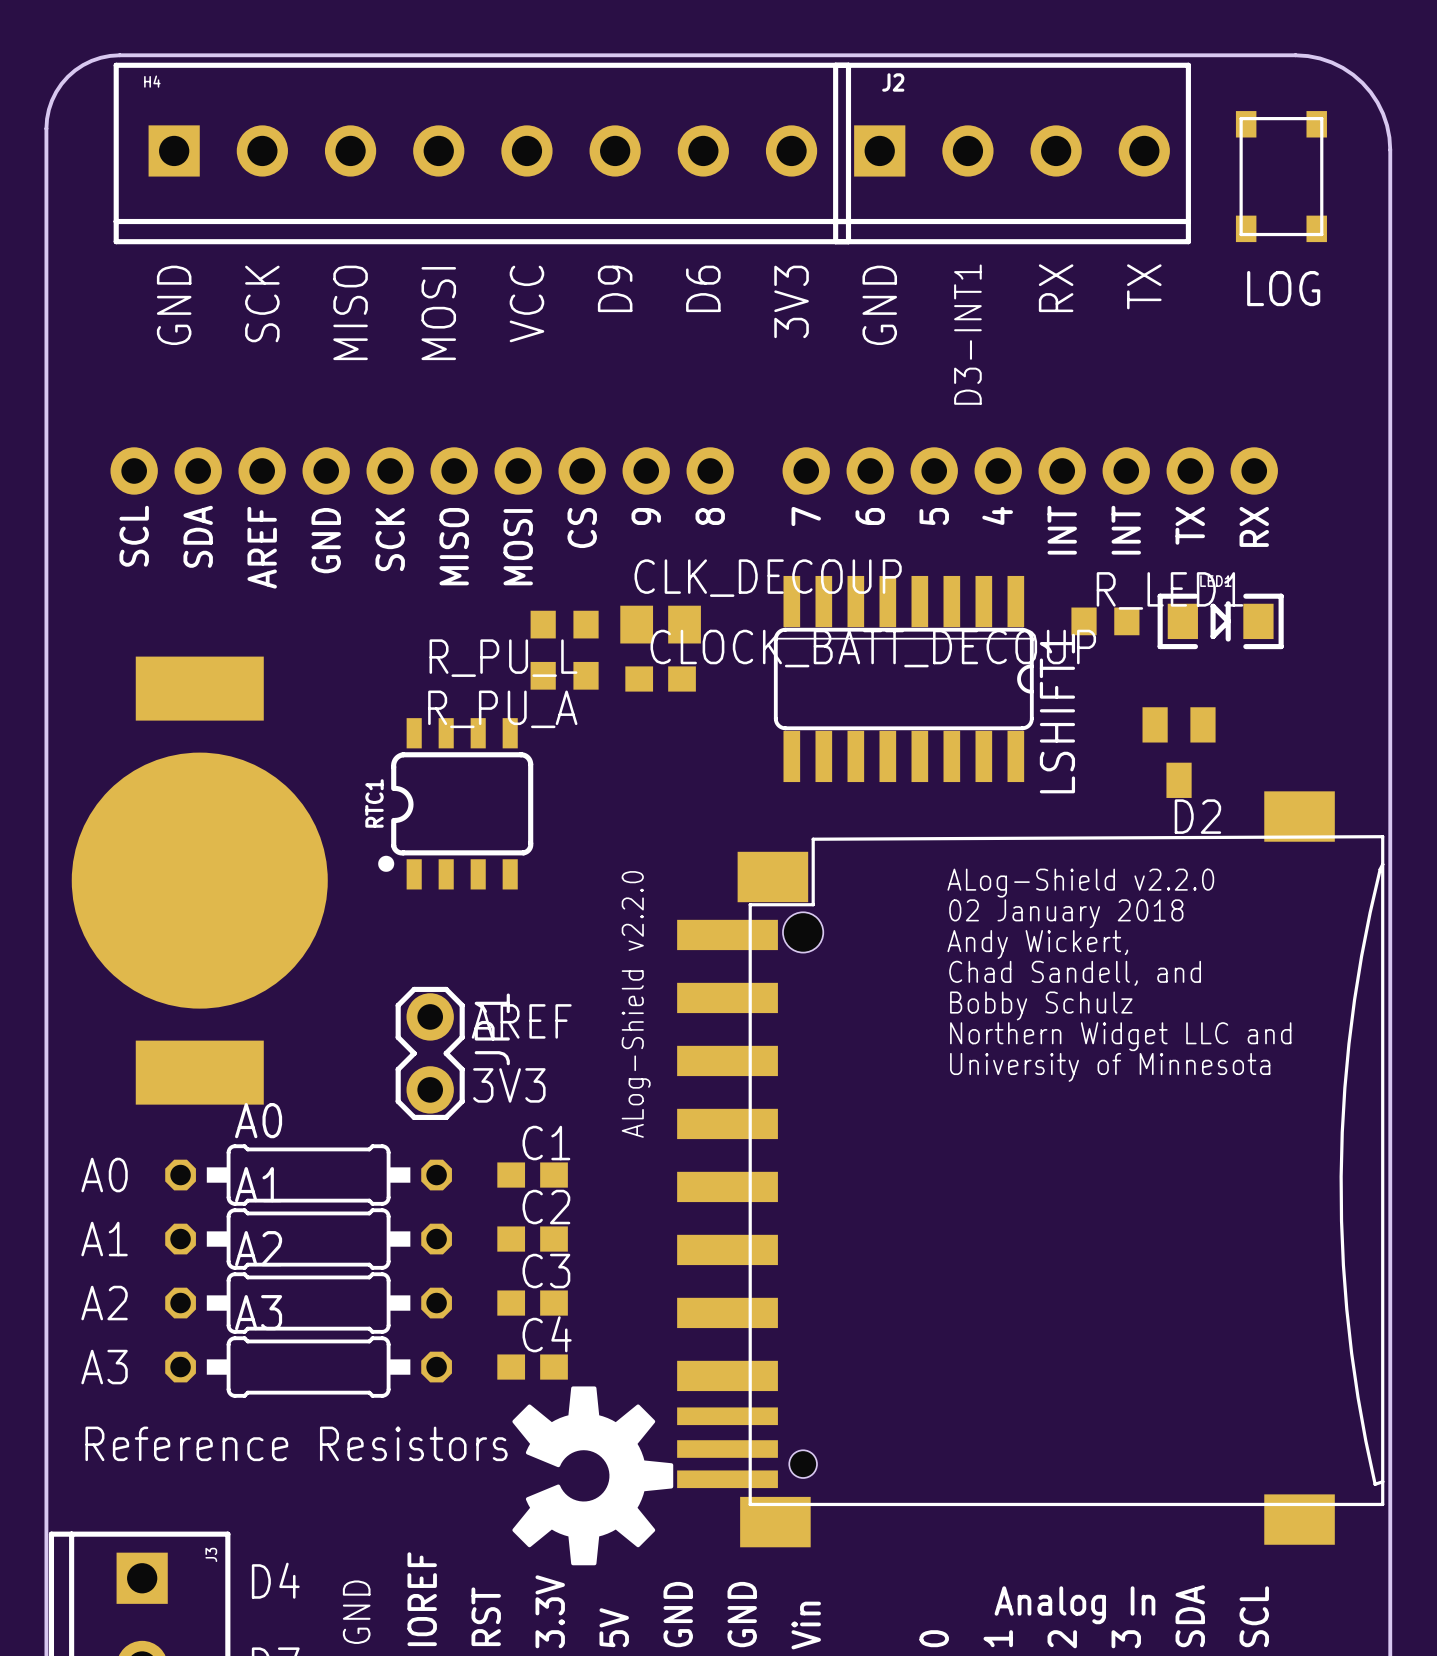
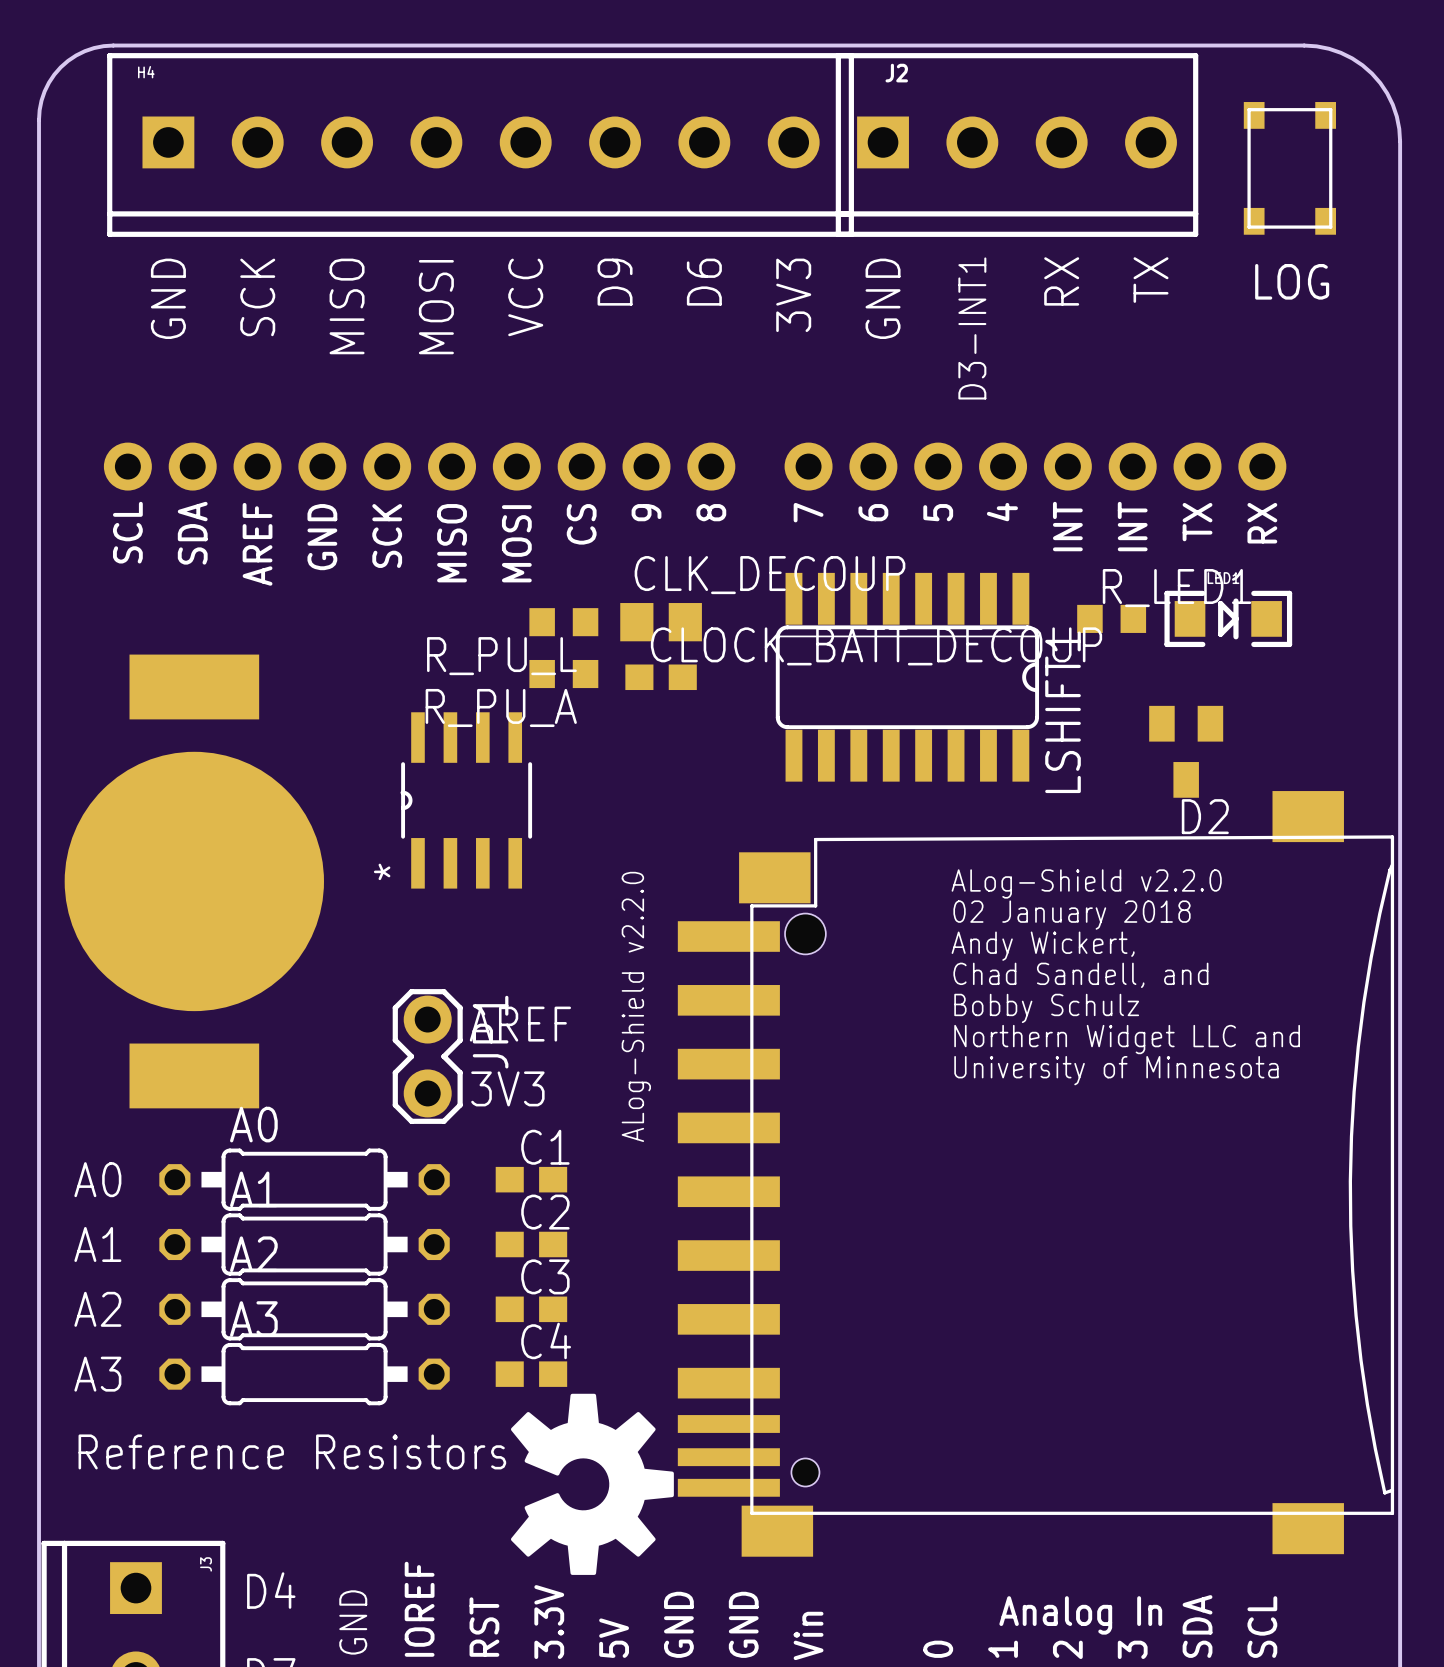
part: none -> (466, 800)
RTC1: (455, 803) -> none

